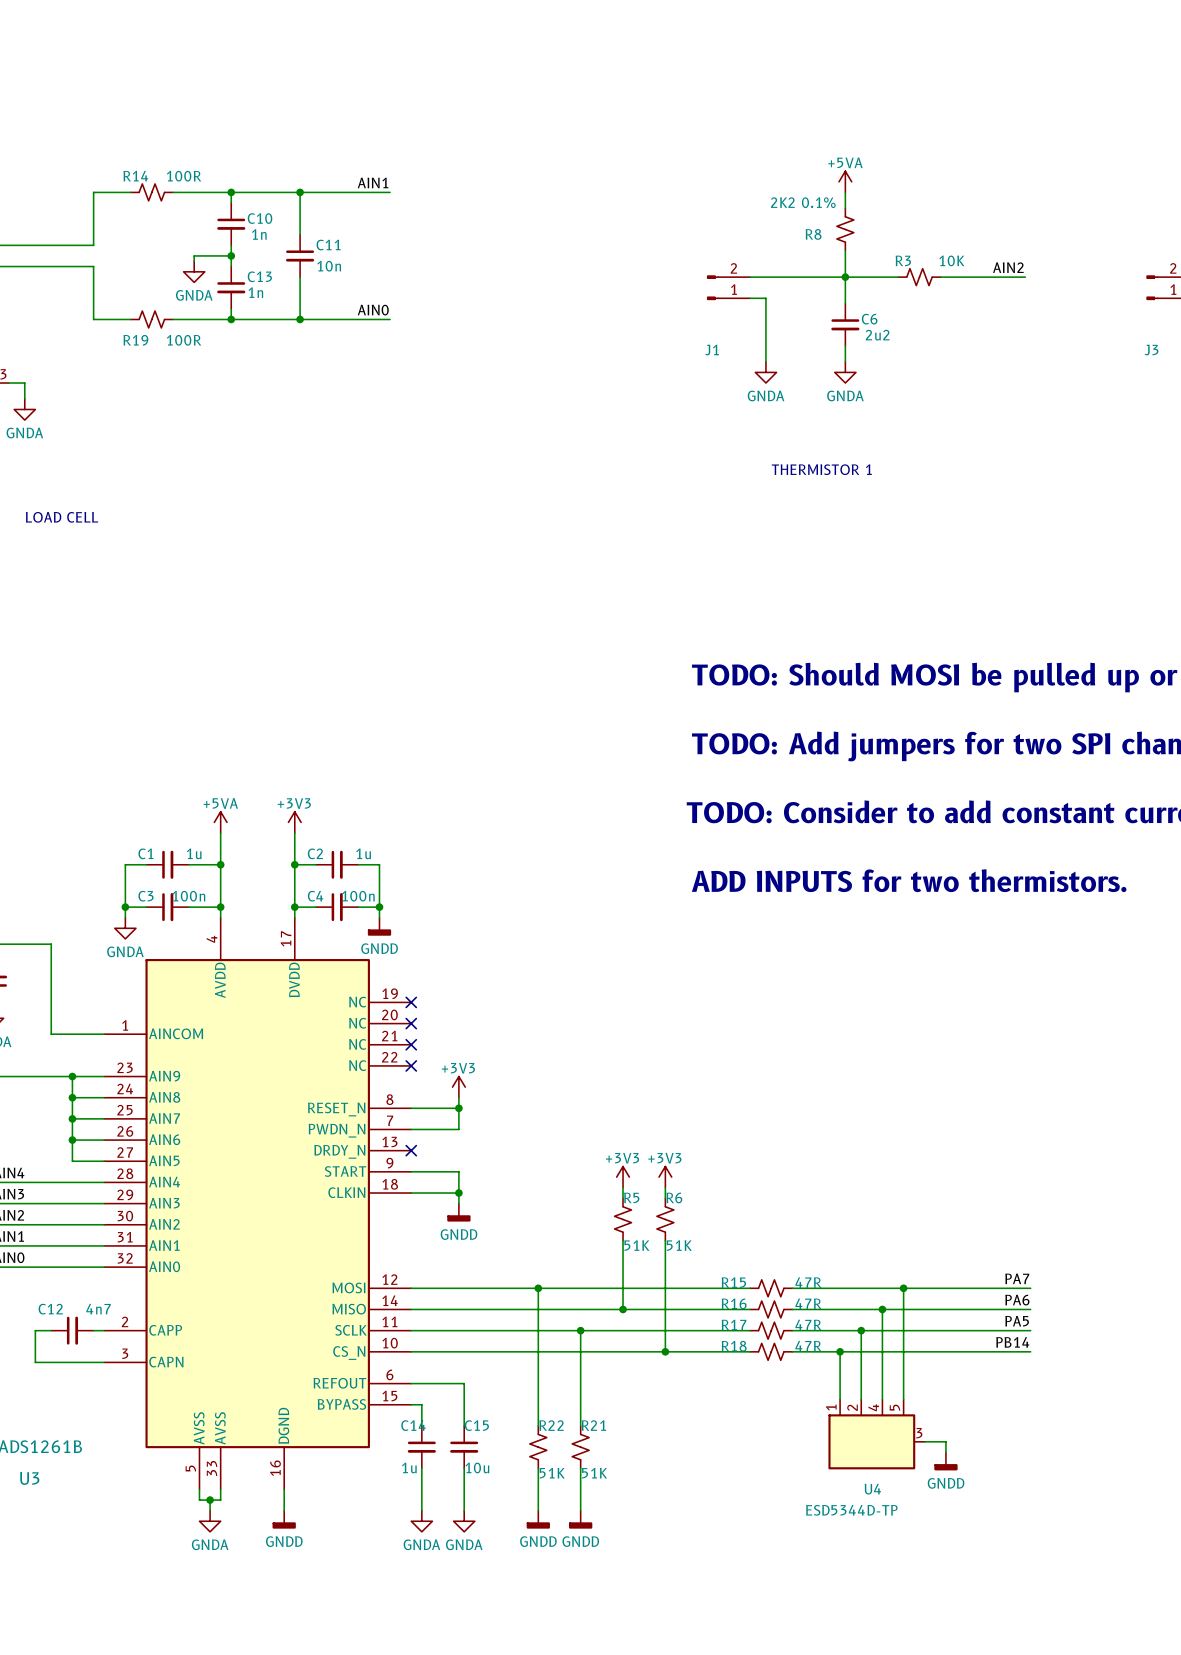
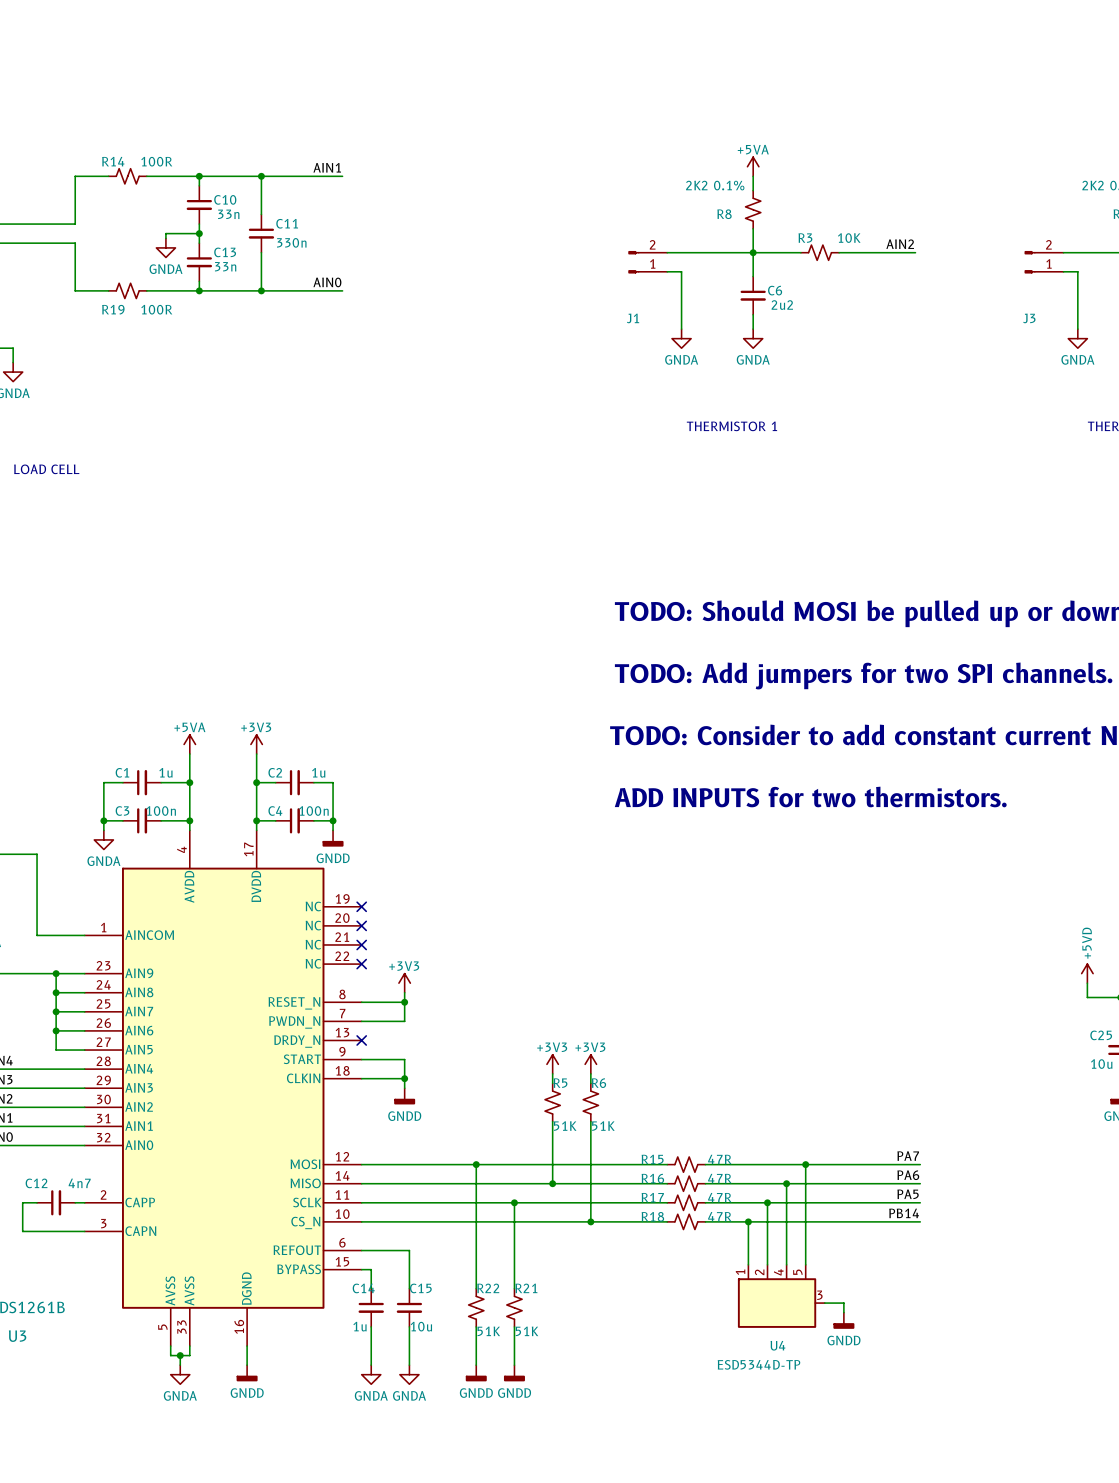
C10 value: 1n (259, 234) -> 33n (228, 214)
C11 value: 10n (329, 266) -> 330n (291, 242)
C13 value: 1n (255, 292) -> 33n (225, 266)

